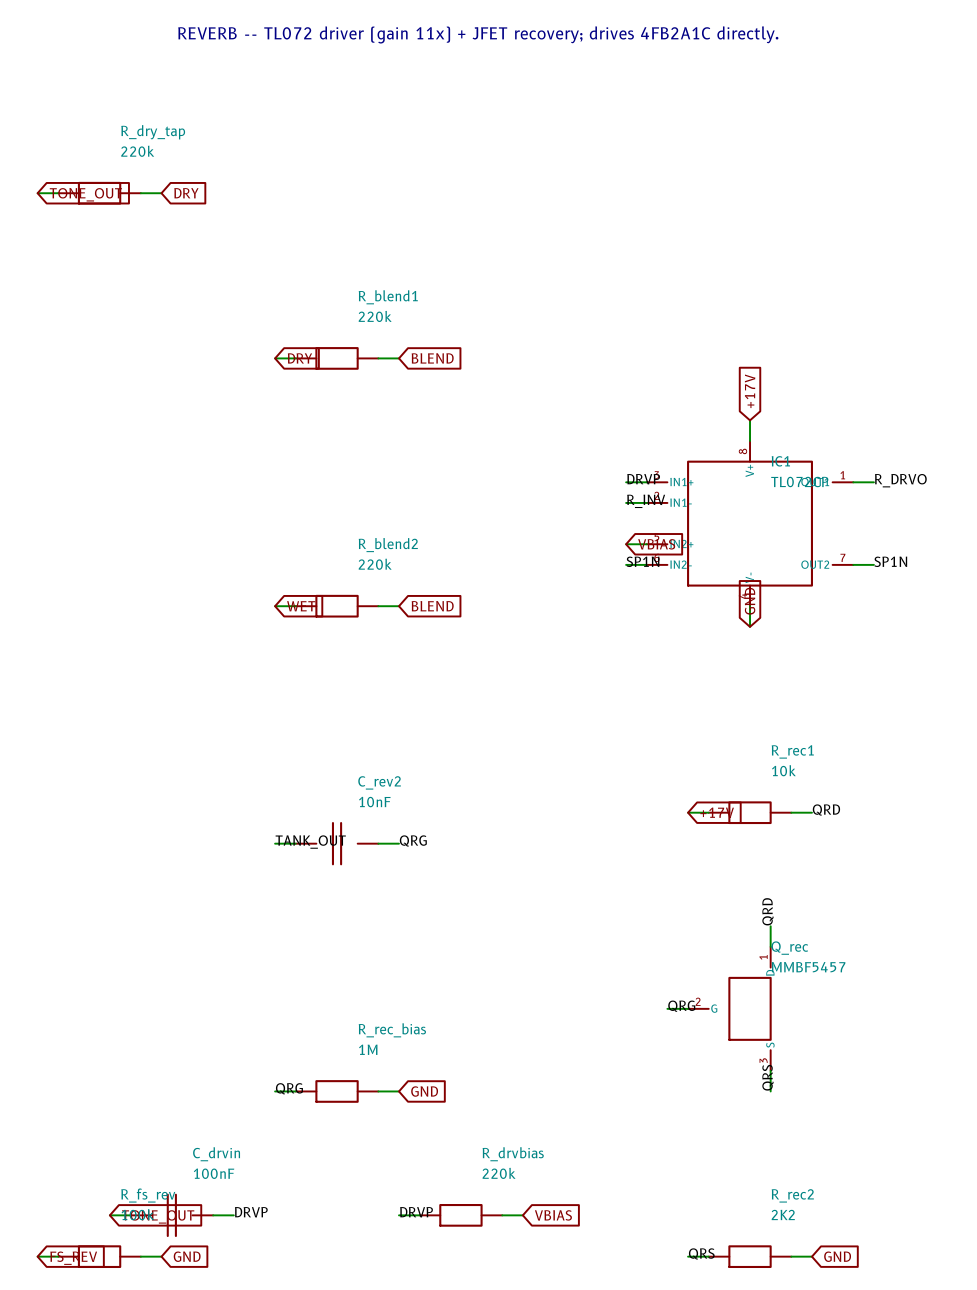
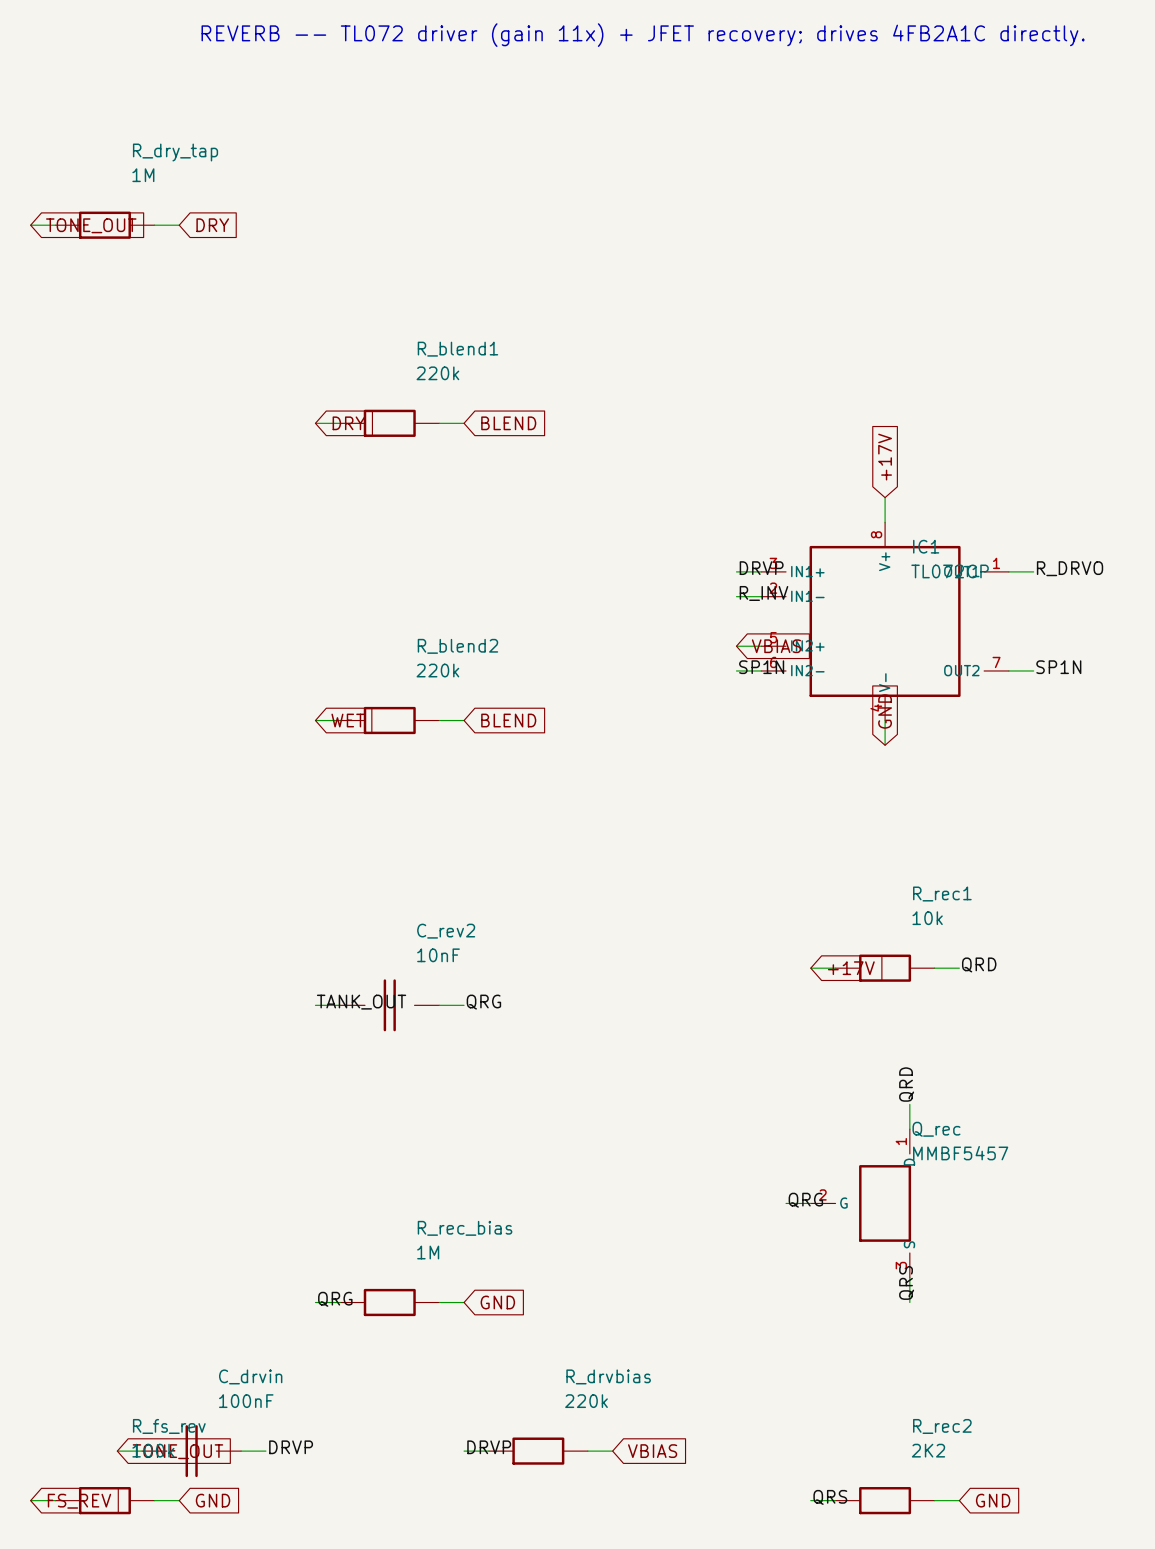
R_dry_tap value: 220k (137, 151) -> 1M (143, 175)

